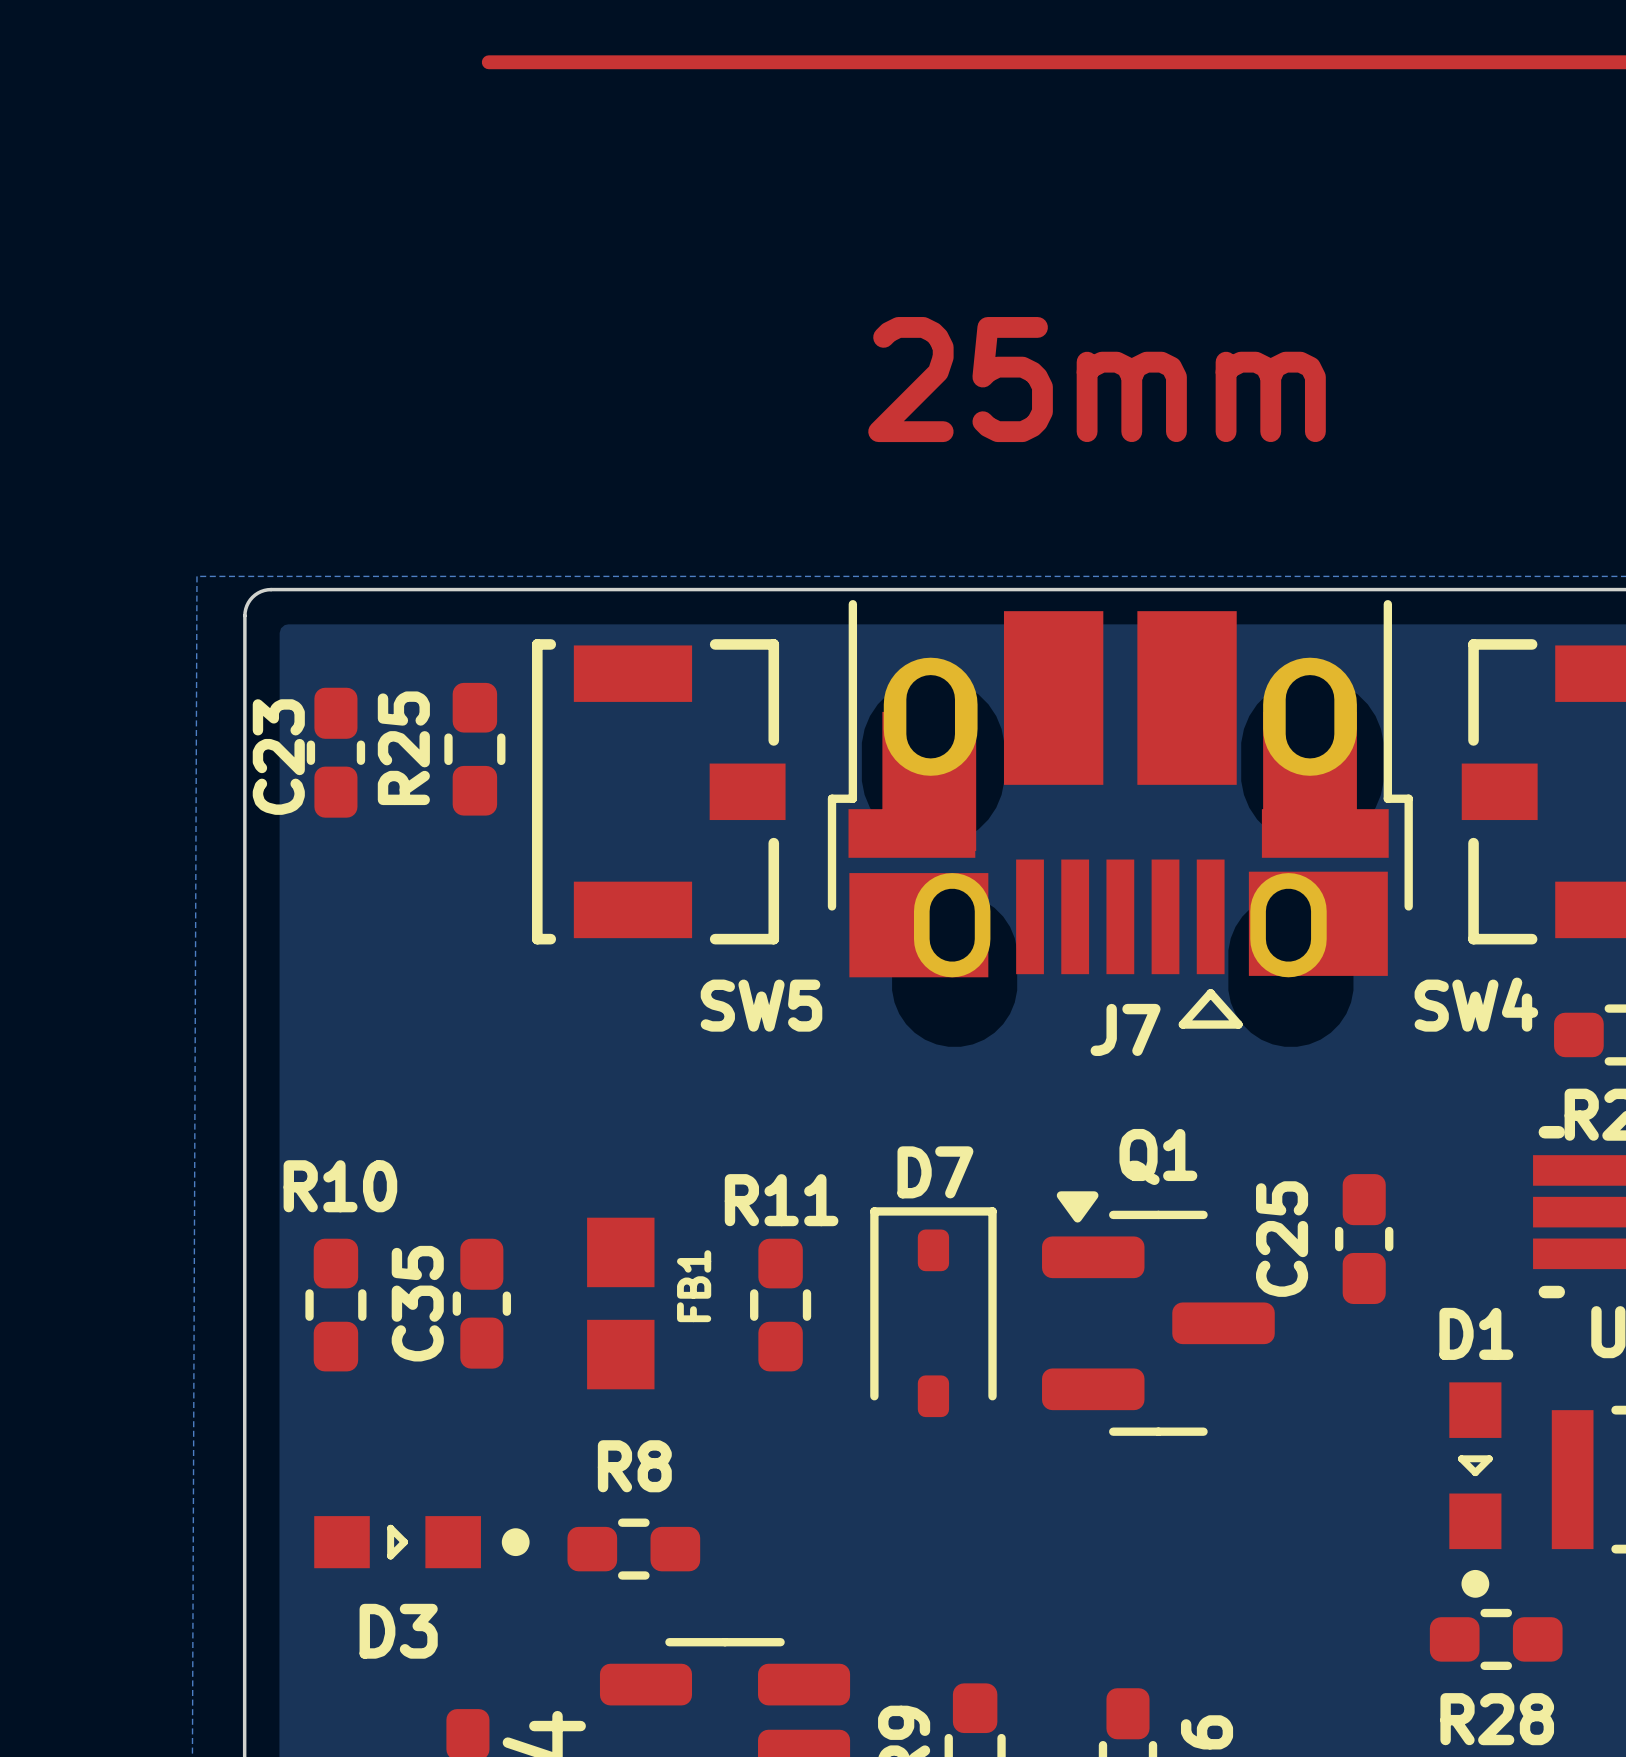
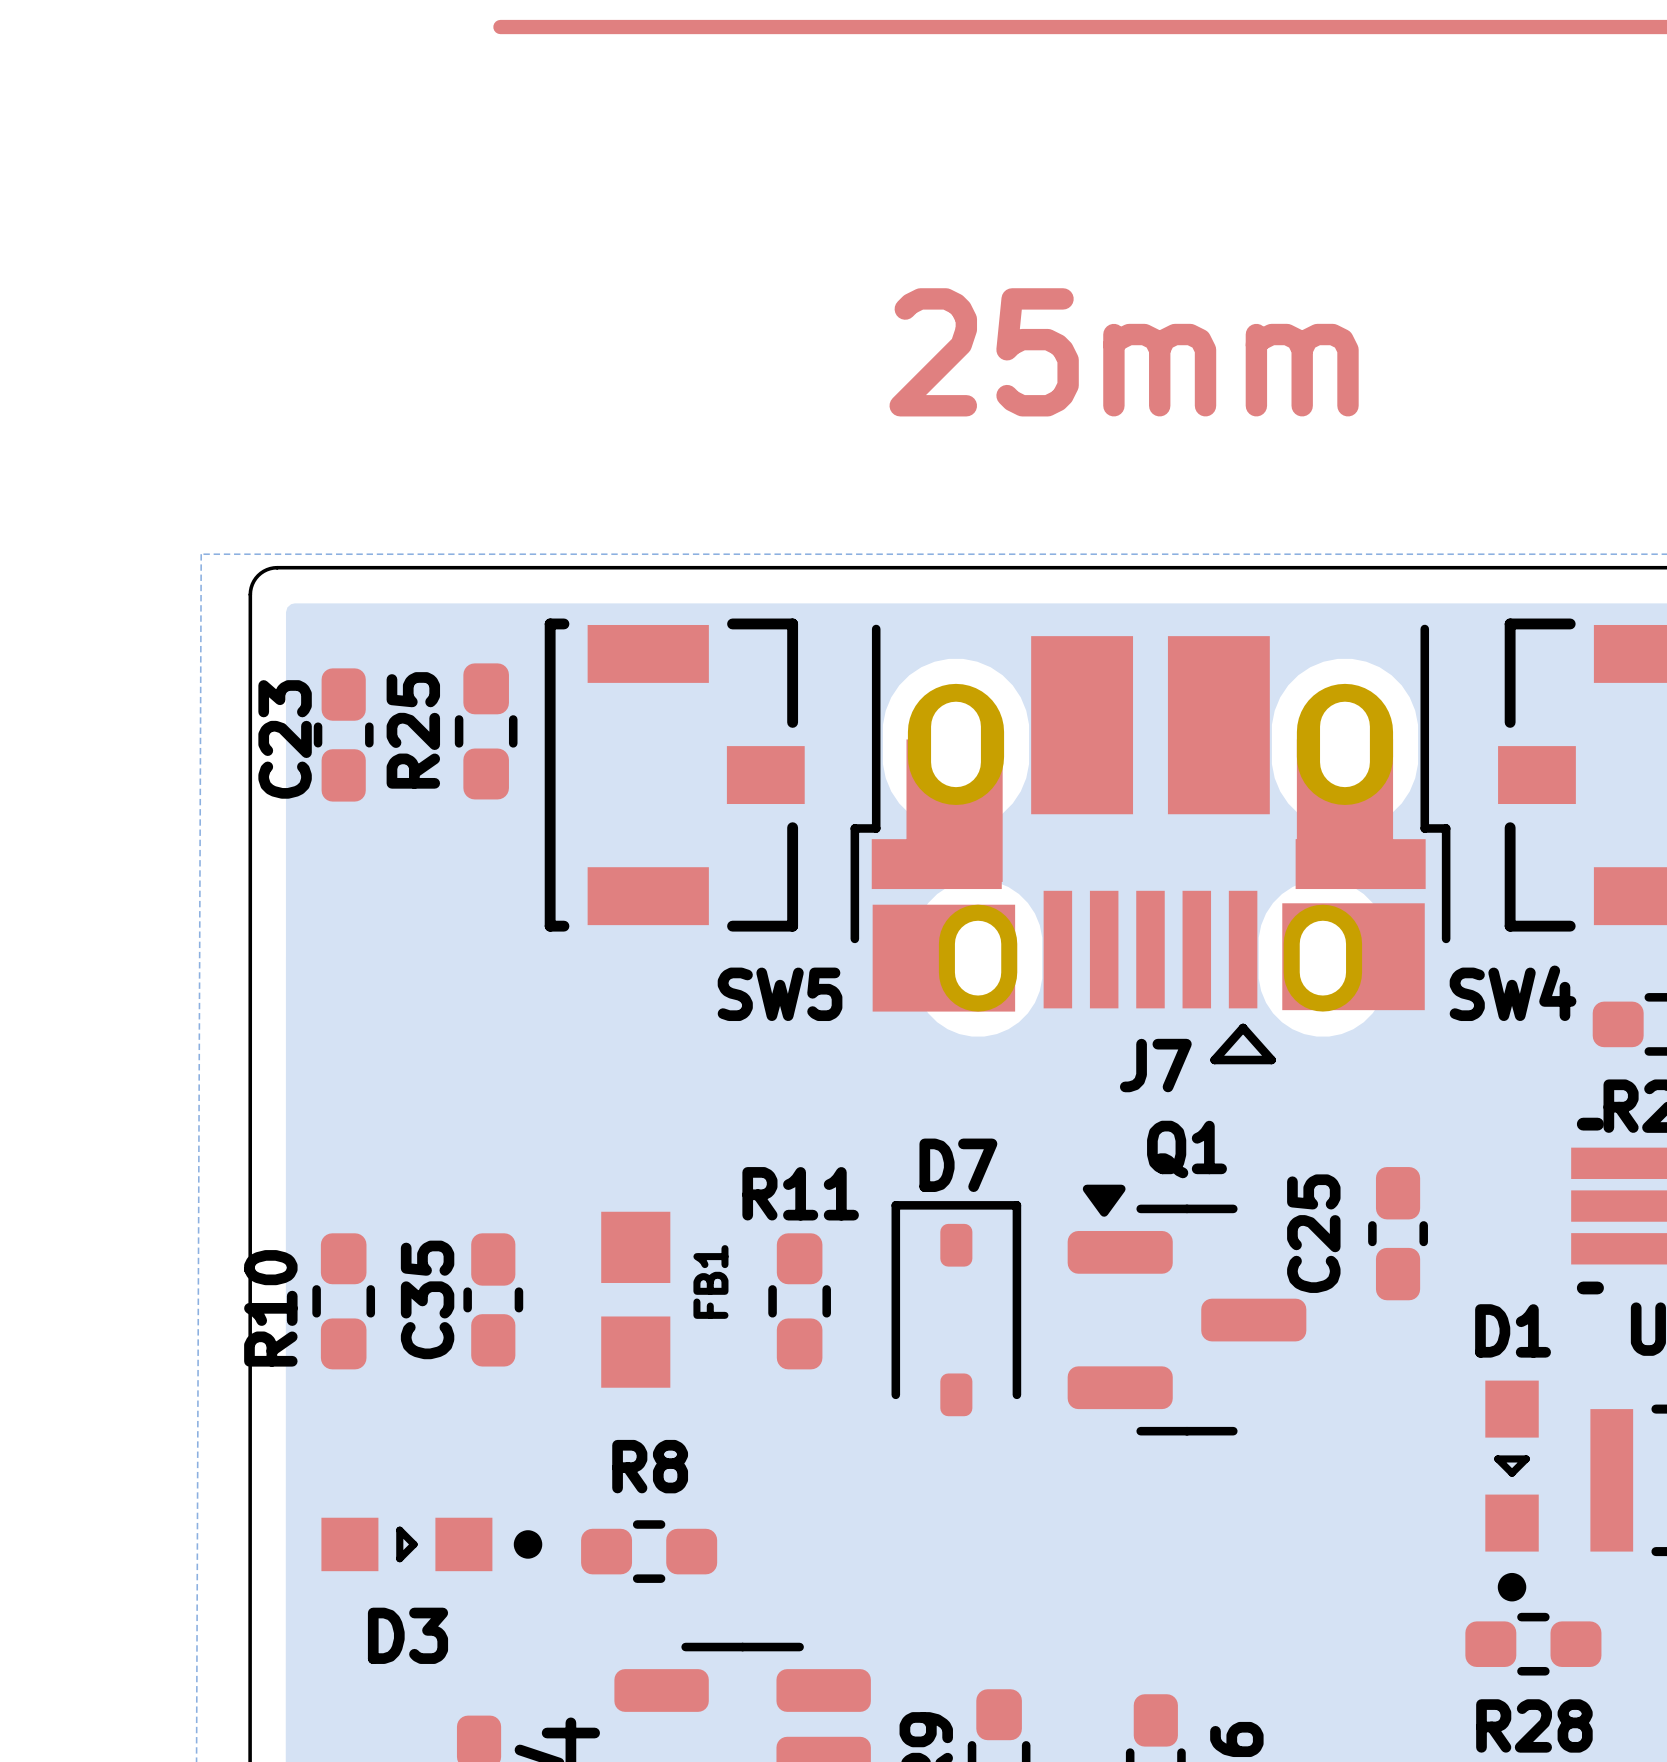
J7 position: (1120, 814) -> (1150, 844)
R10 name rotation: 0° (340, 1186) -> 90° counterclockwise (270, 1308)

